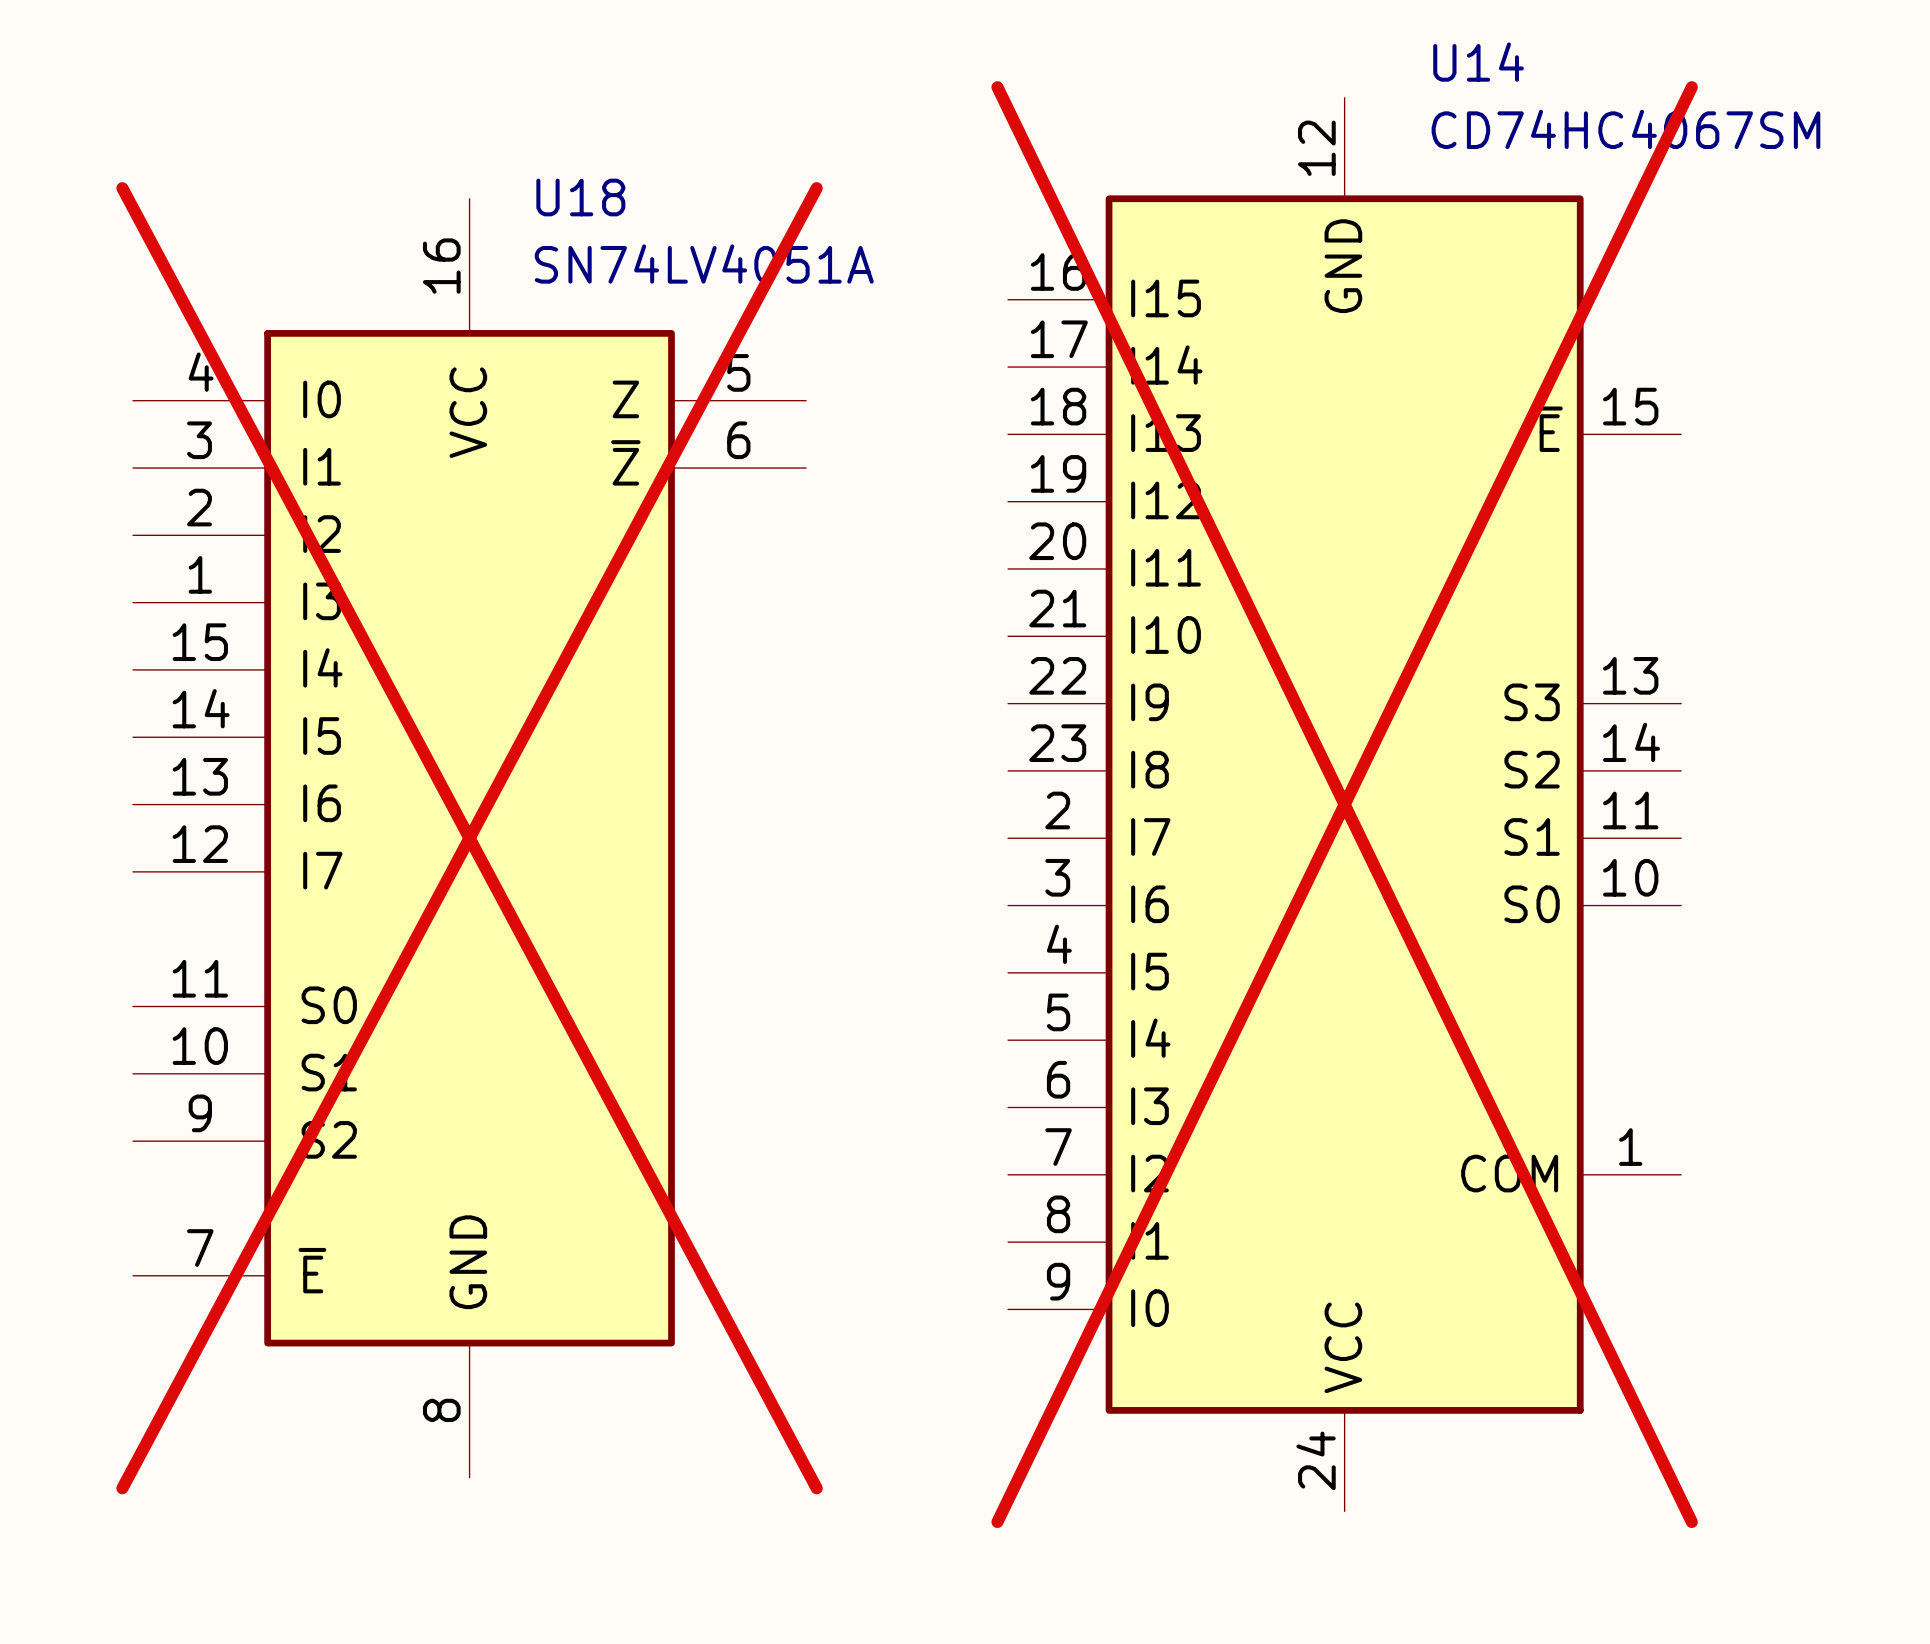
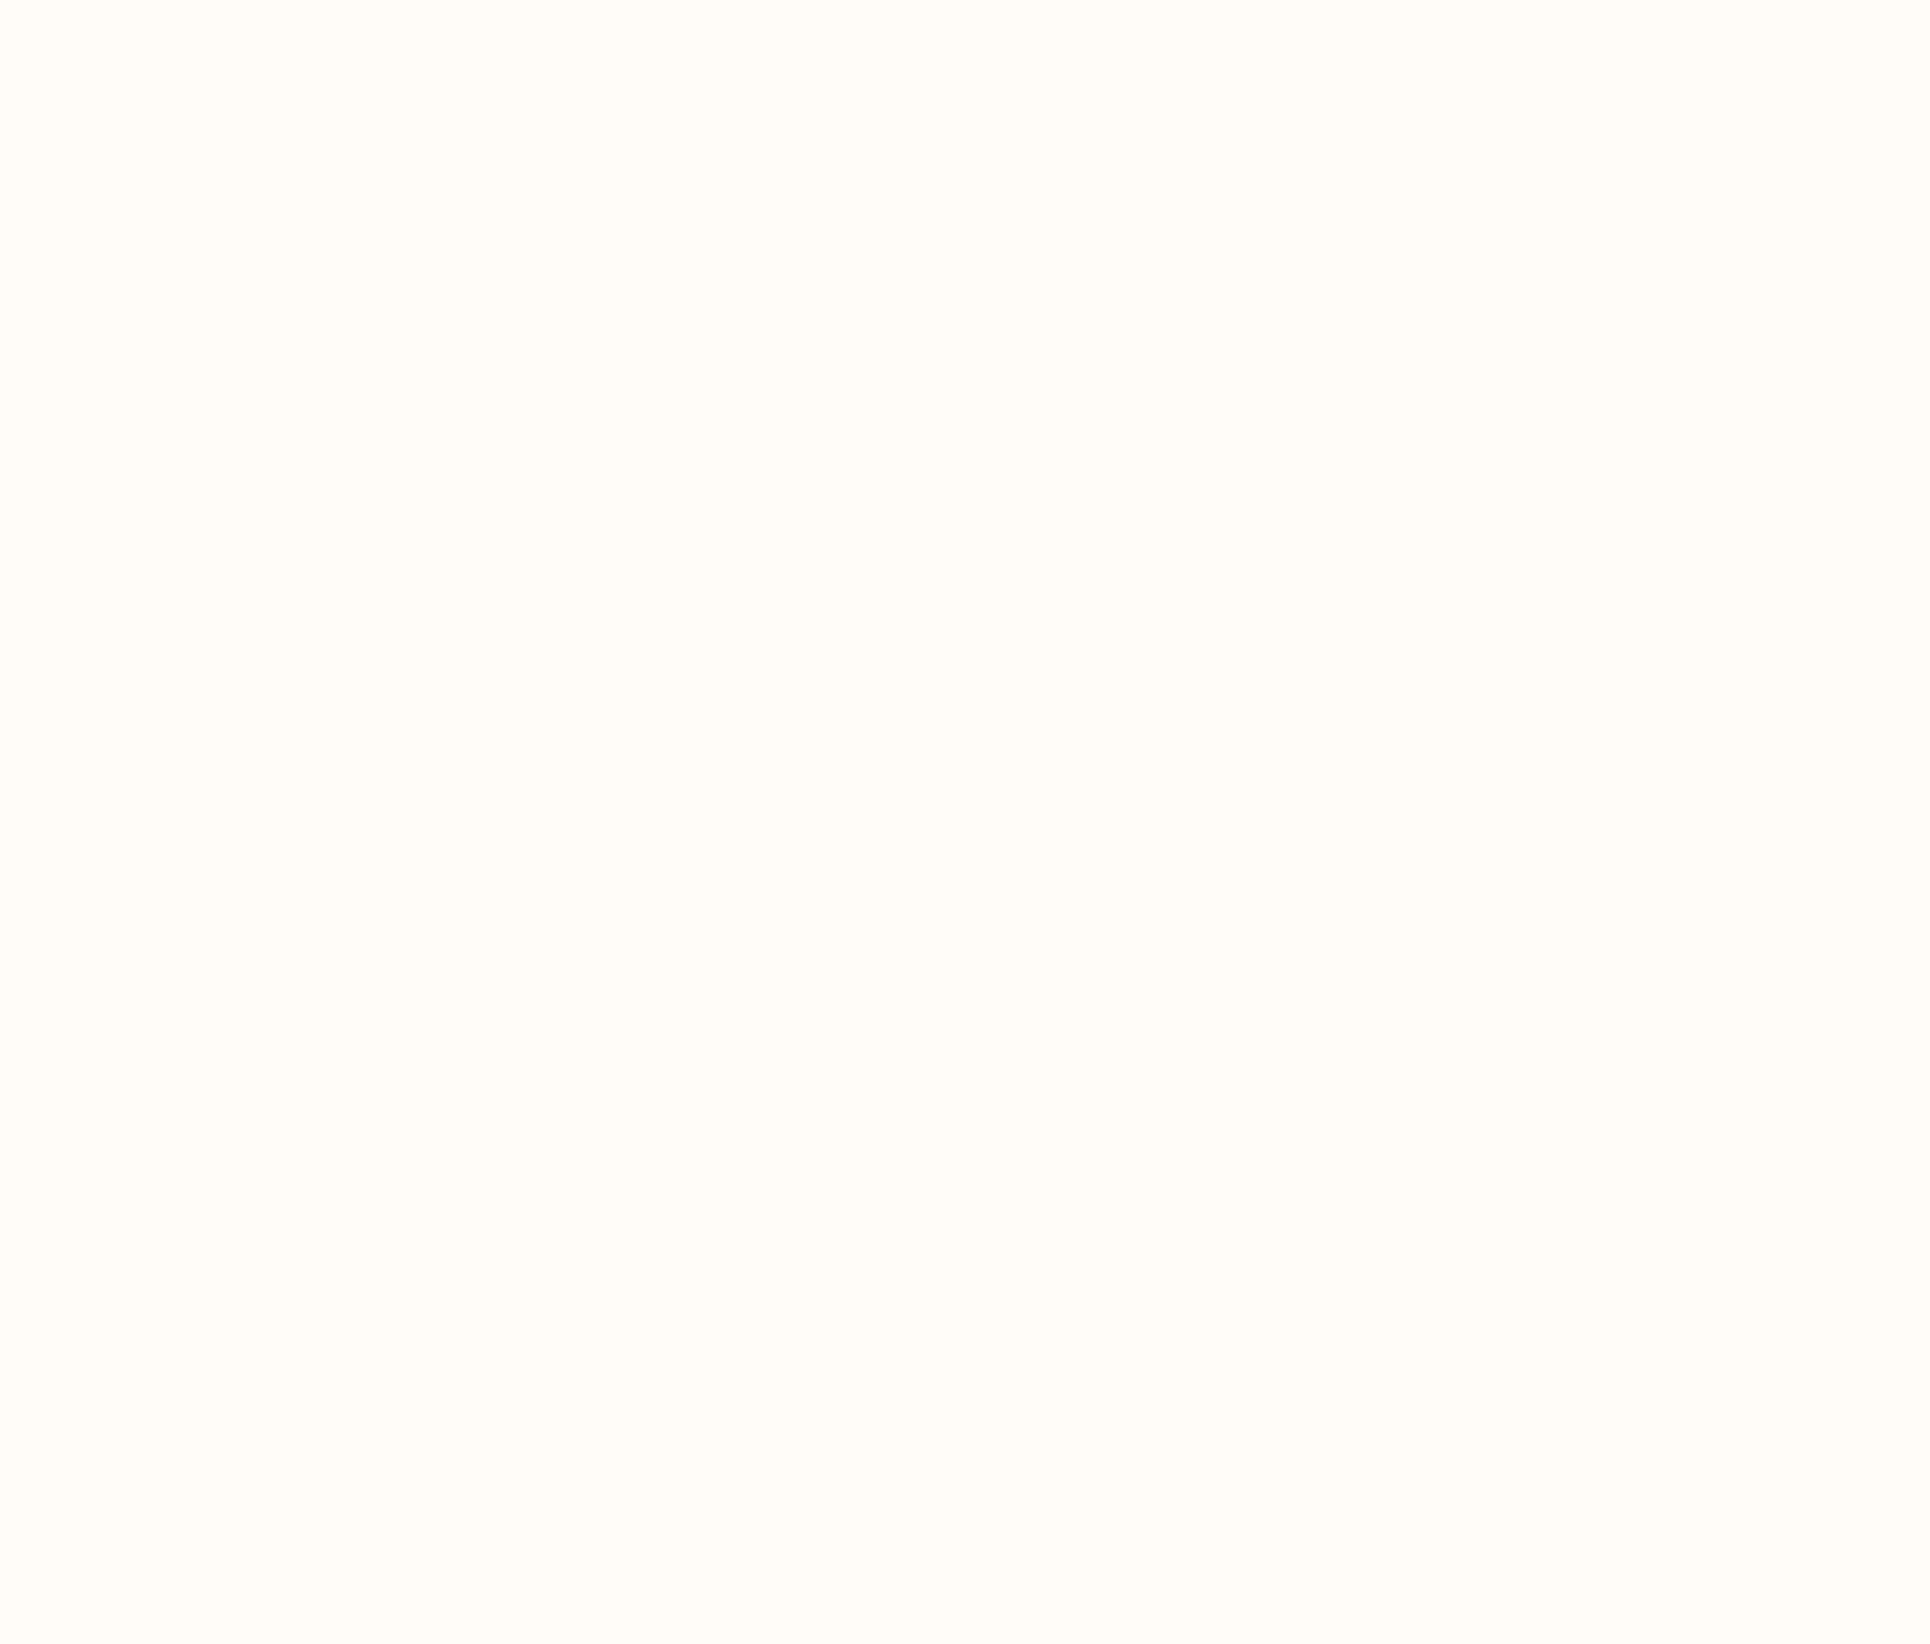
U14: CD74HC4067SM (1344, 804) -> none
U18: SN74LV4051A (469, 838) -> none

